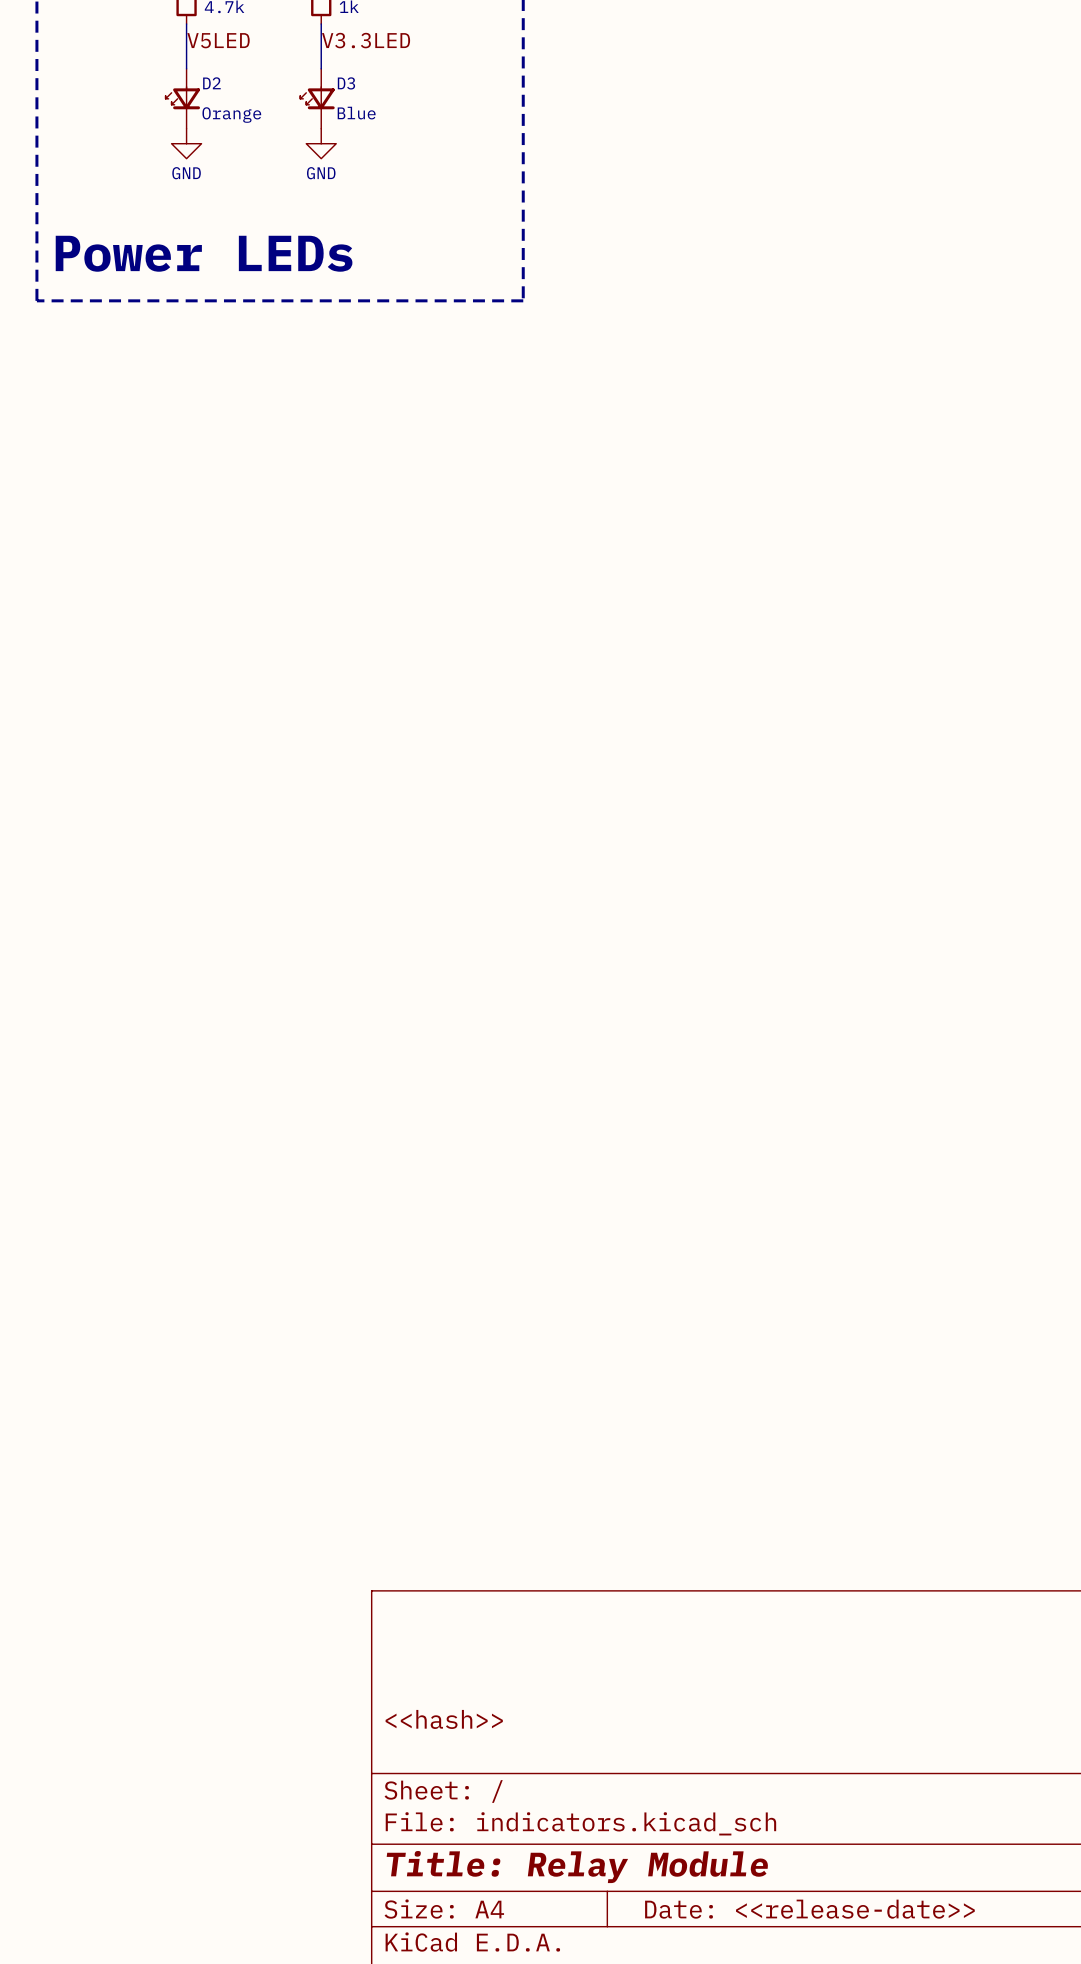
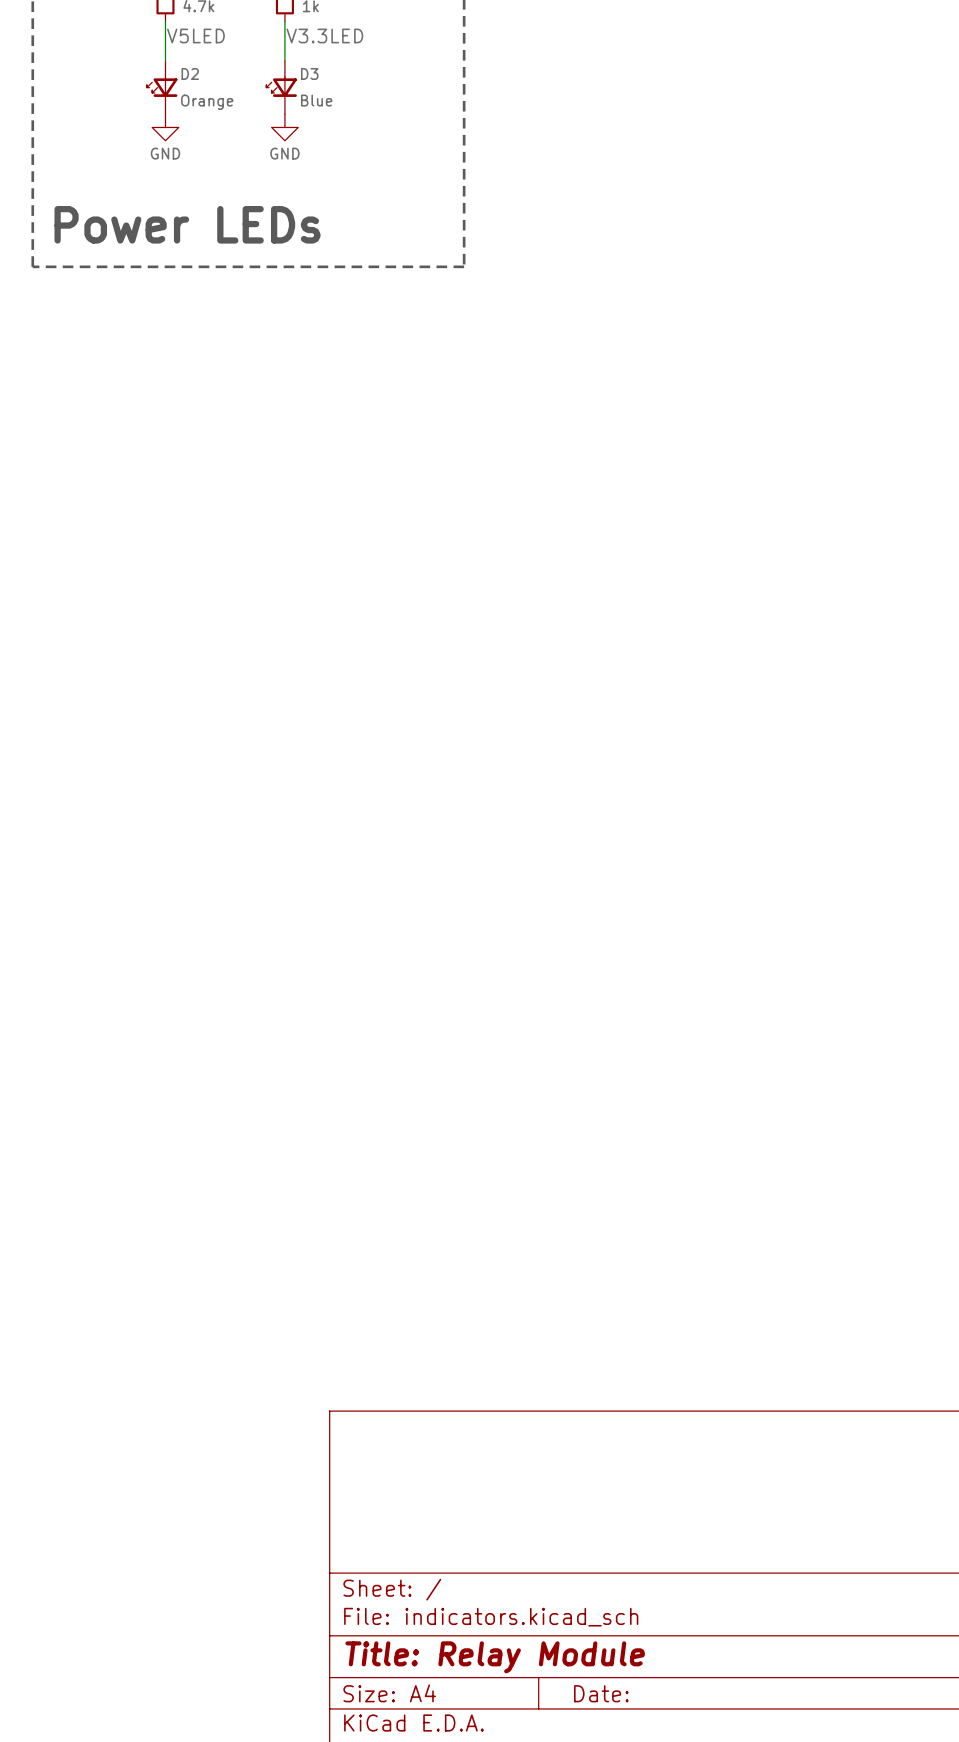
title block: <<hash>> (444, 1719) -> none
title block: Date: <<release-date>> (809, 1909) -> Date: (601, 1693)

